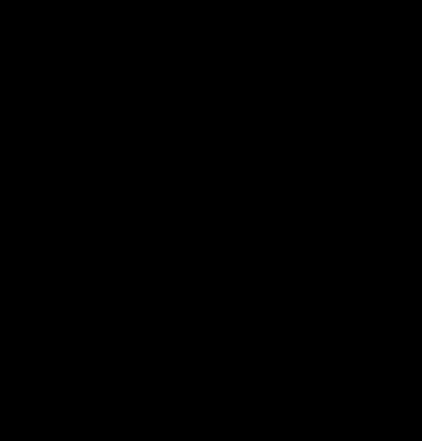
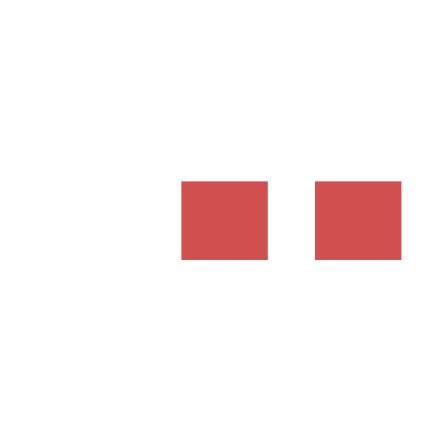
part: none -> (291, 220)

